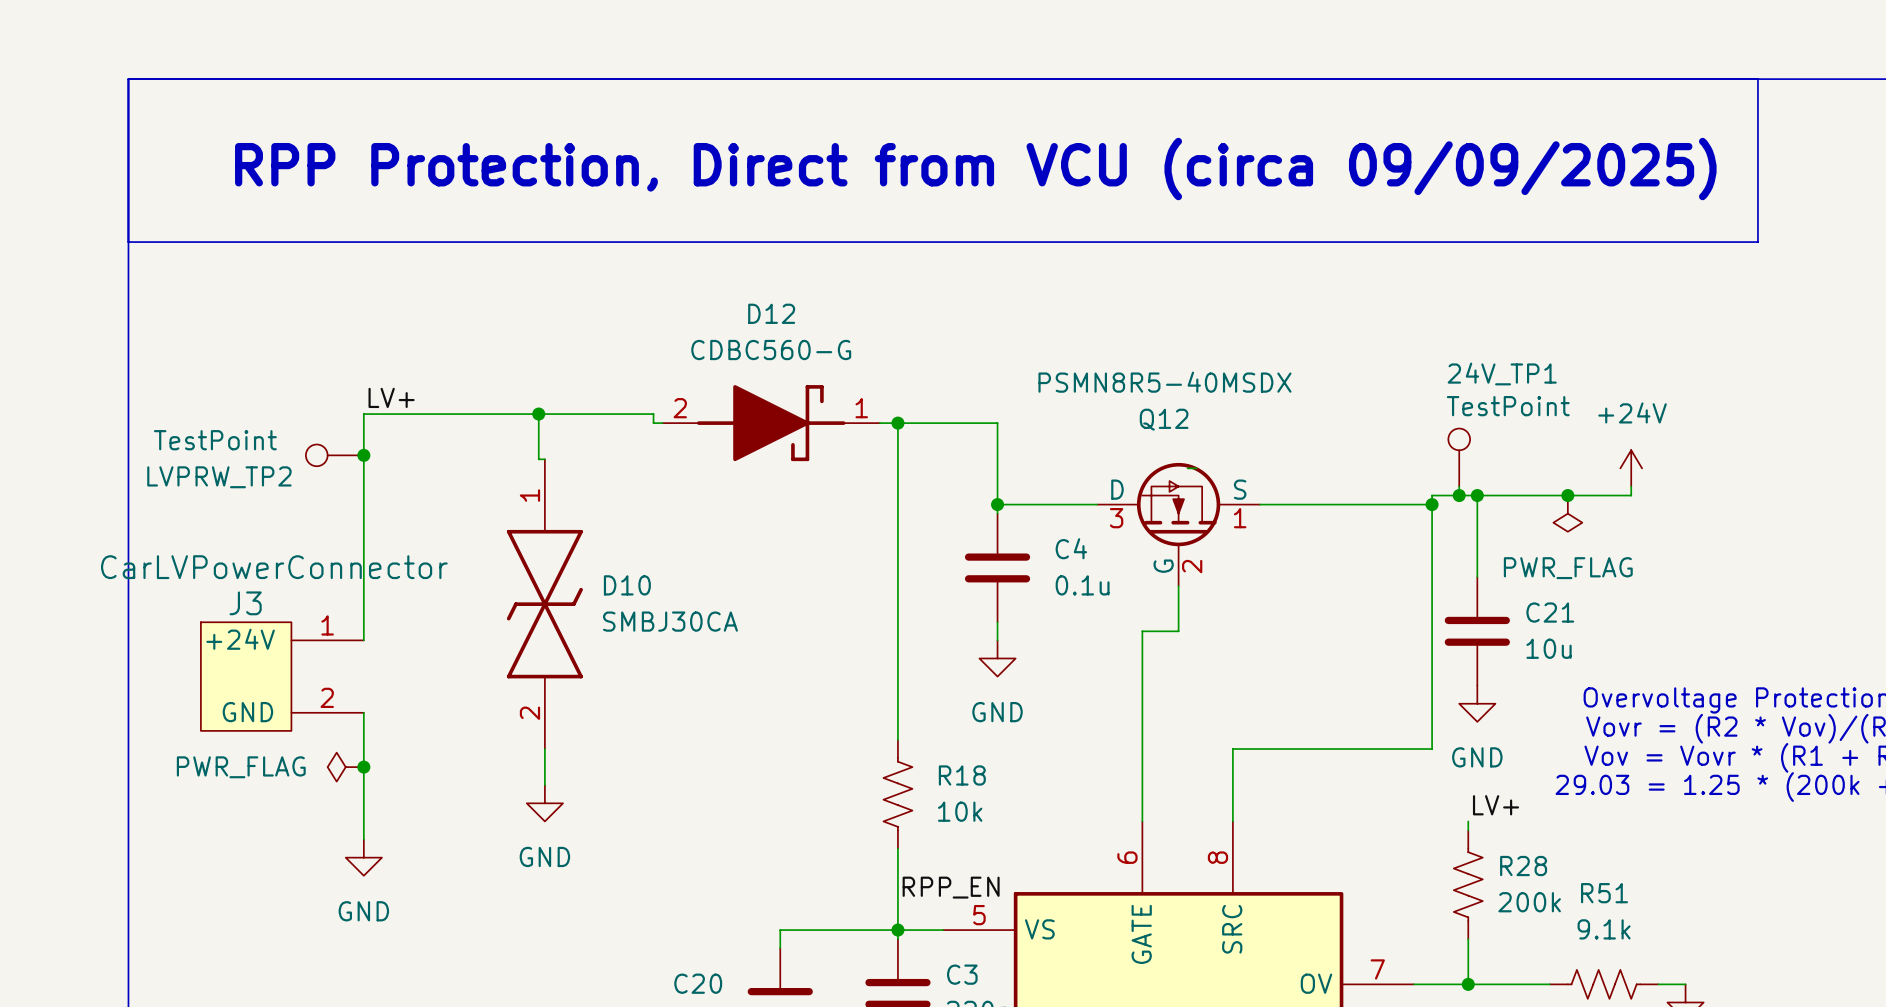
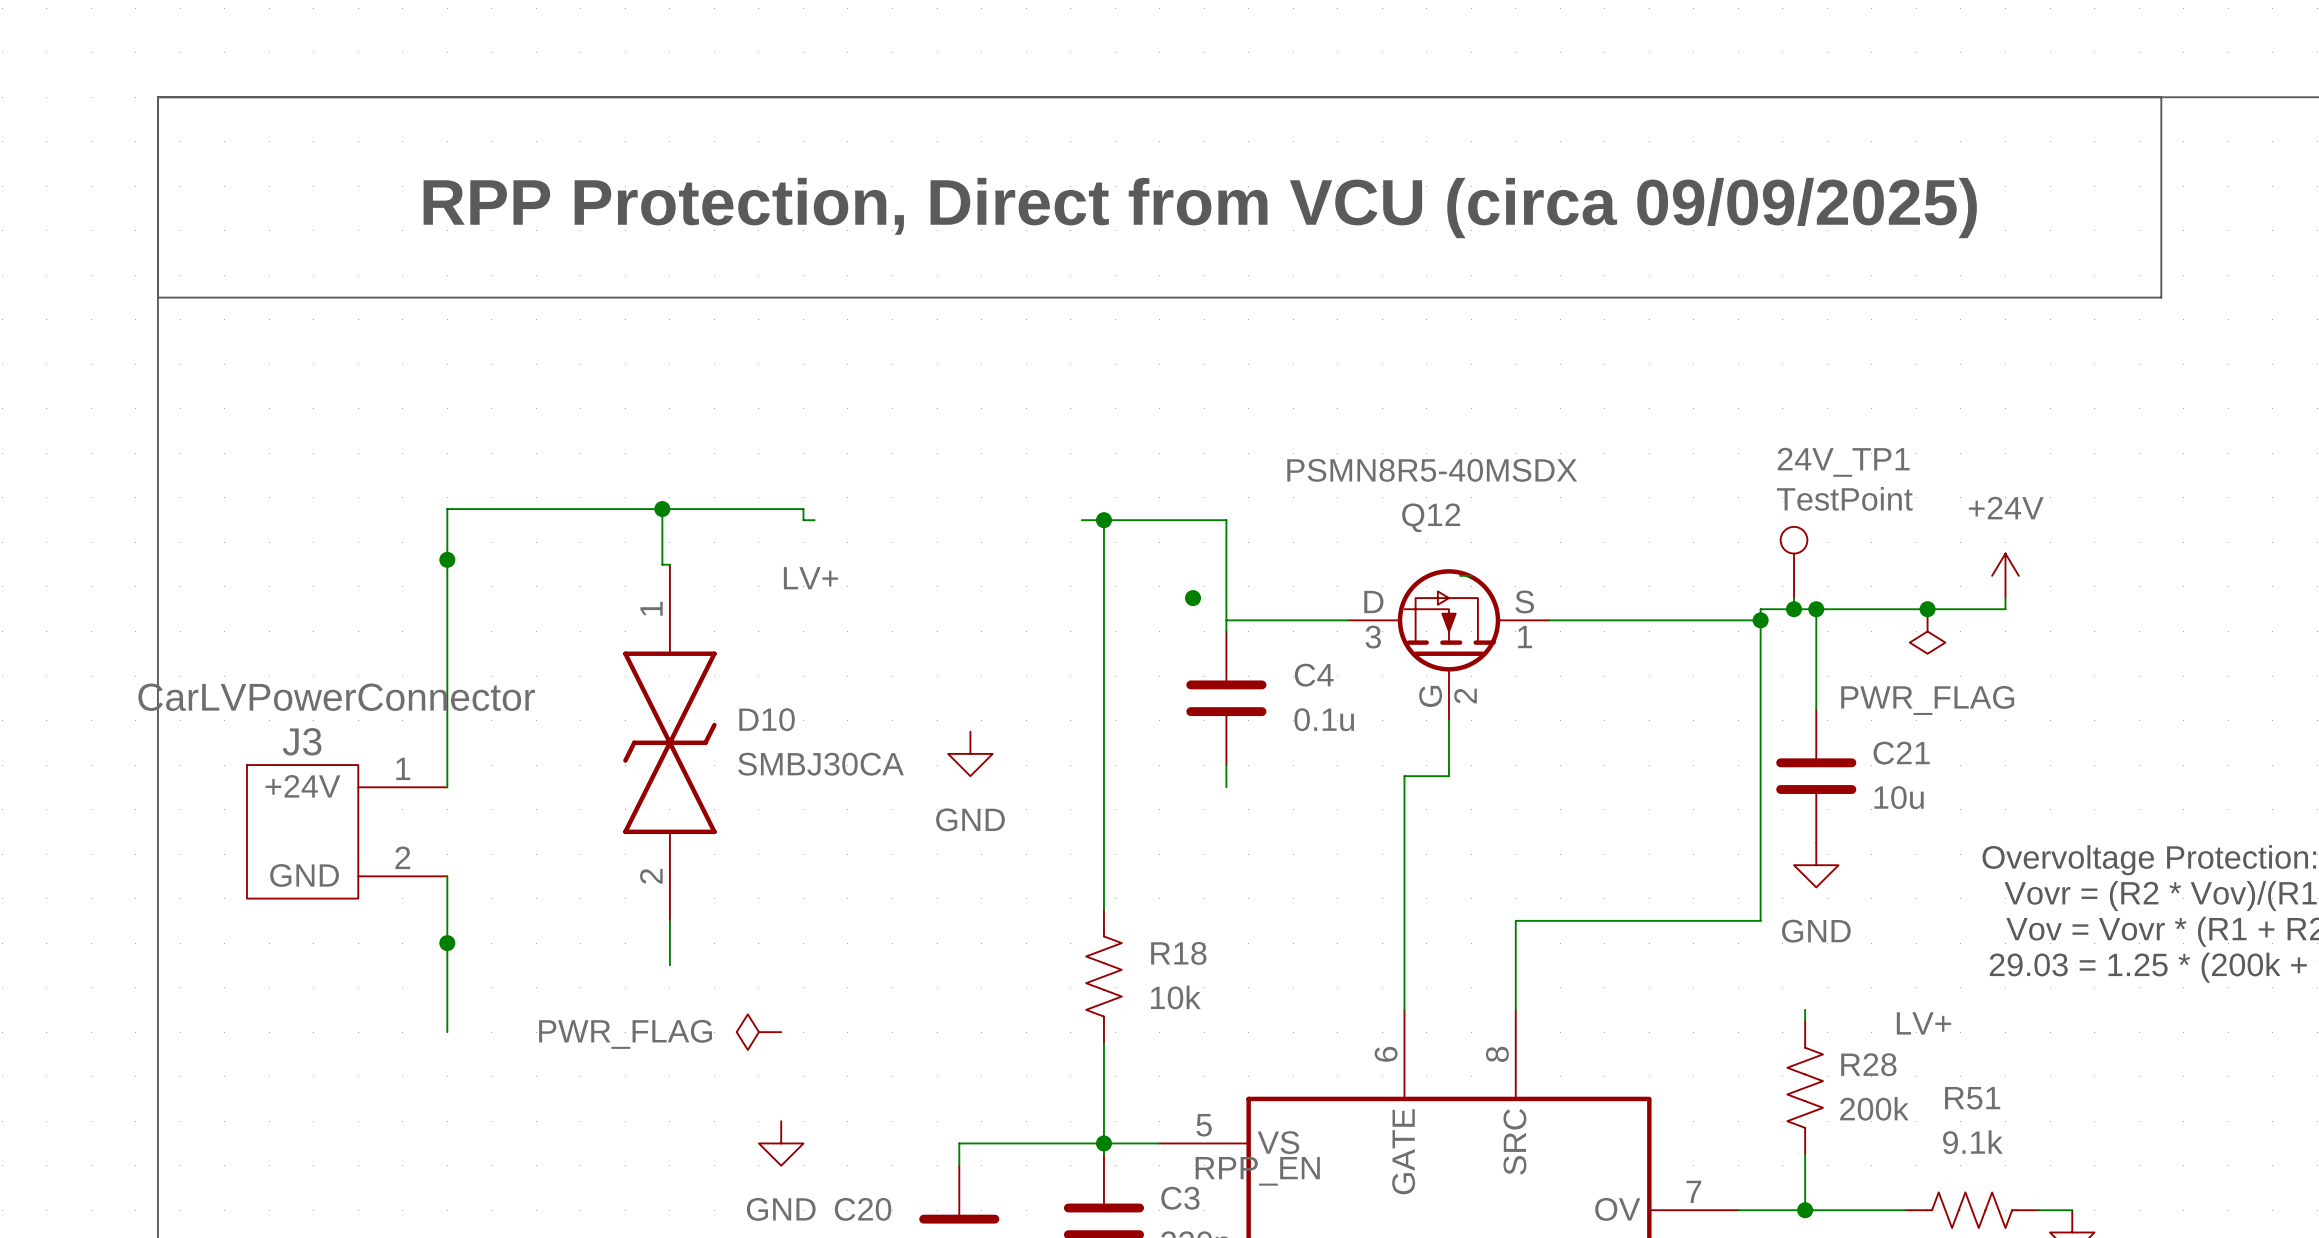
label position: LV+ (391, 397) -> LV+ (810, 578)
D12: CDBC560-G (771, 423) -> none
LVPRW_TP2: TestPoint (334, 455) -> none
junction position: (997, 504) -> (1193, 598)
power symbol: none -> GND (970, 753)
power symbol: GND (997, 658) -> none
power symbol position: PWR_FLAG (345, 767) -> PWR_FLAG (758, 1032)
power symbol: GND (544, 803) -> none
label position: LV+ (1496, 805) -> LV+ (1923, 1023)
power symbol: GND (363, 857) -> none
label position: RPP_EN (951, 887) -> RPP_EN (1257, 1171)
power symbol: none -> GND (781, 1143)

